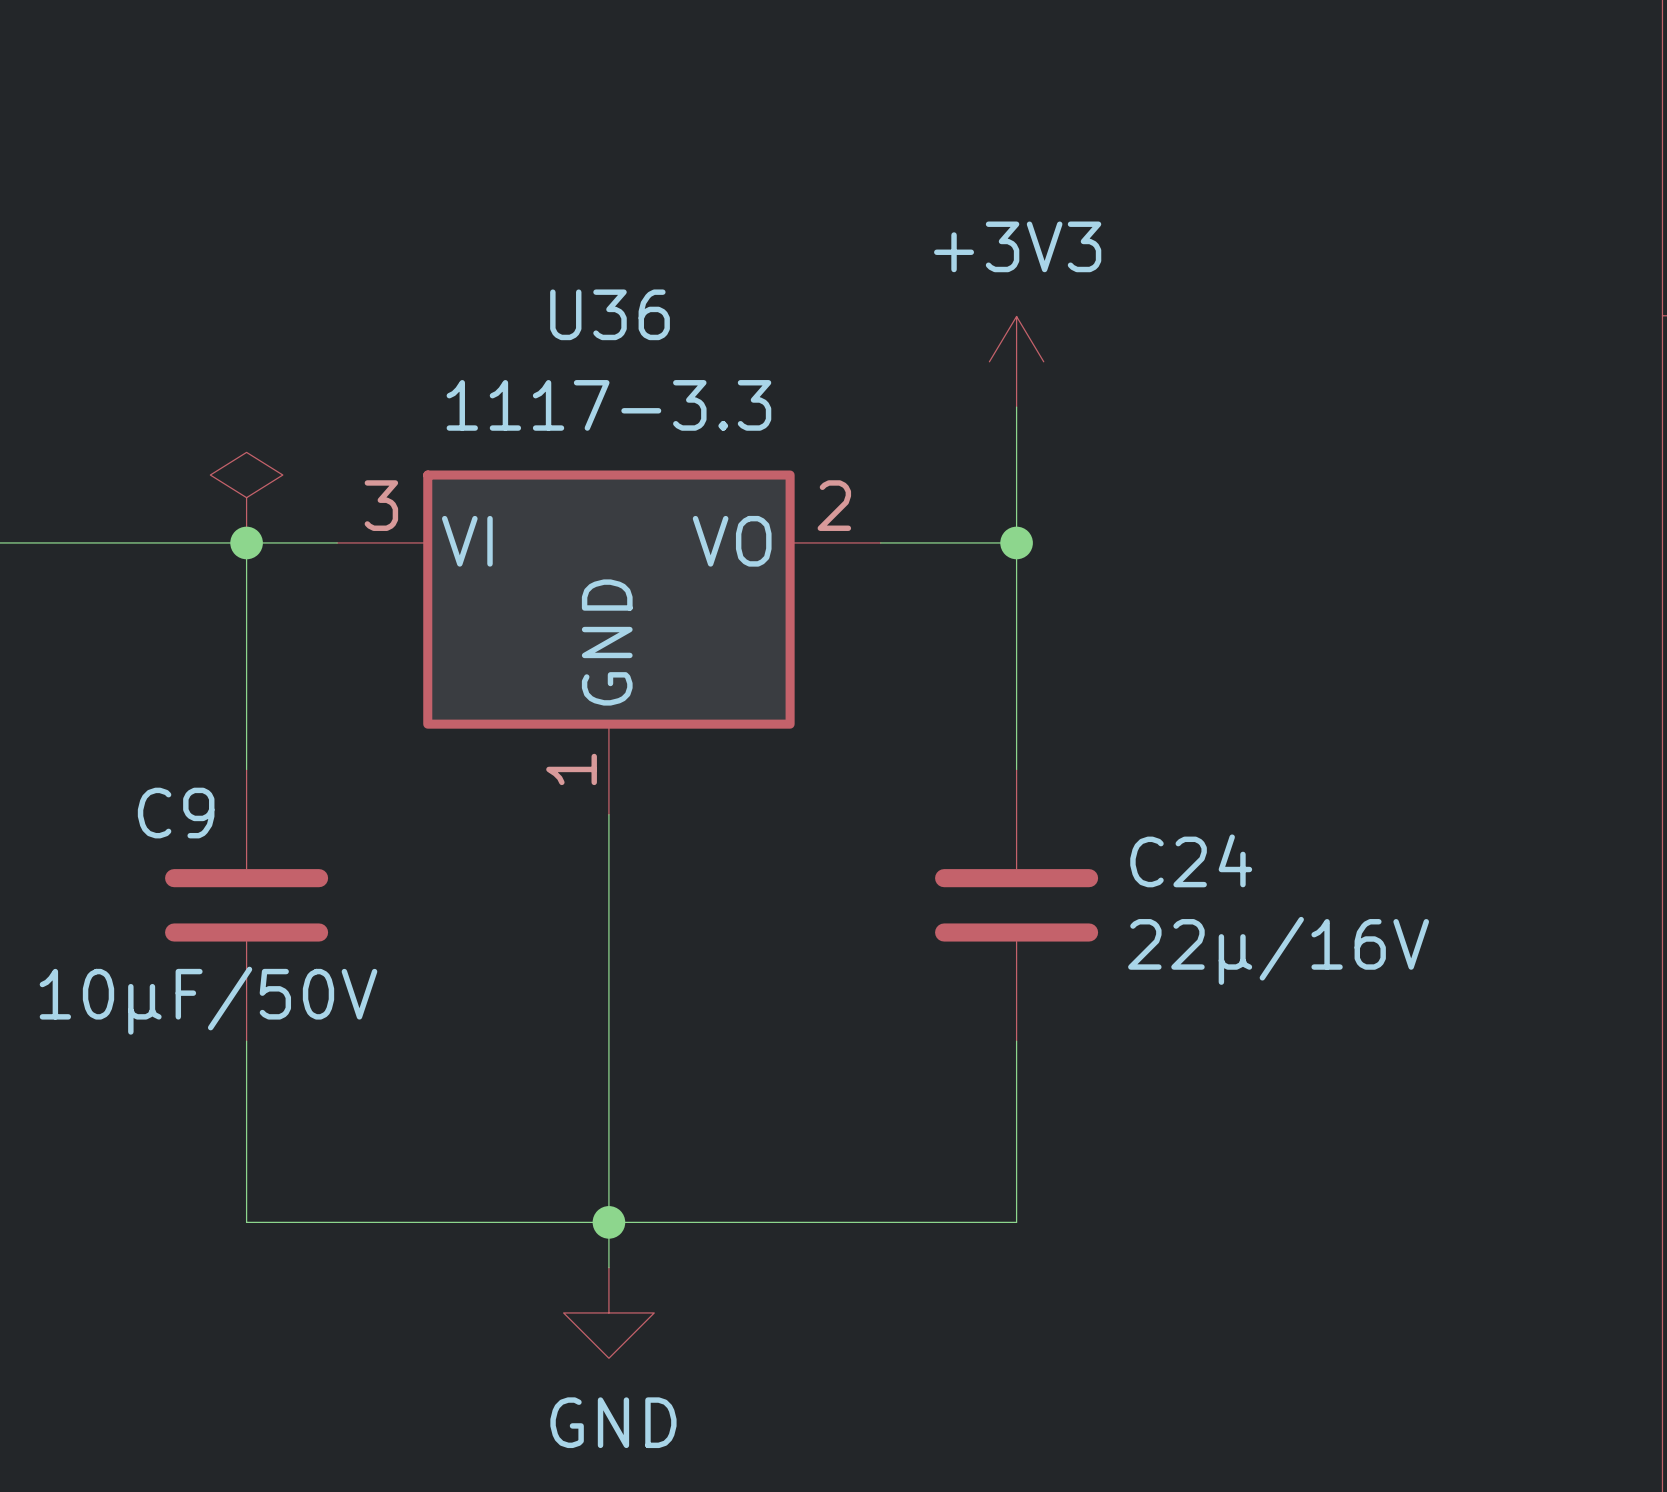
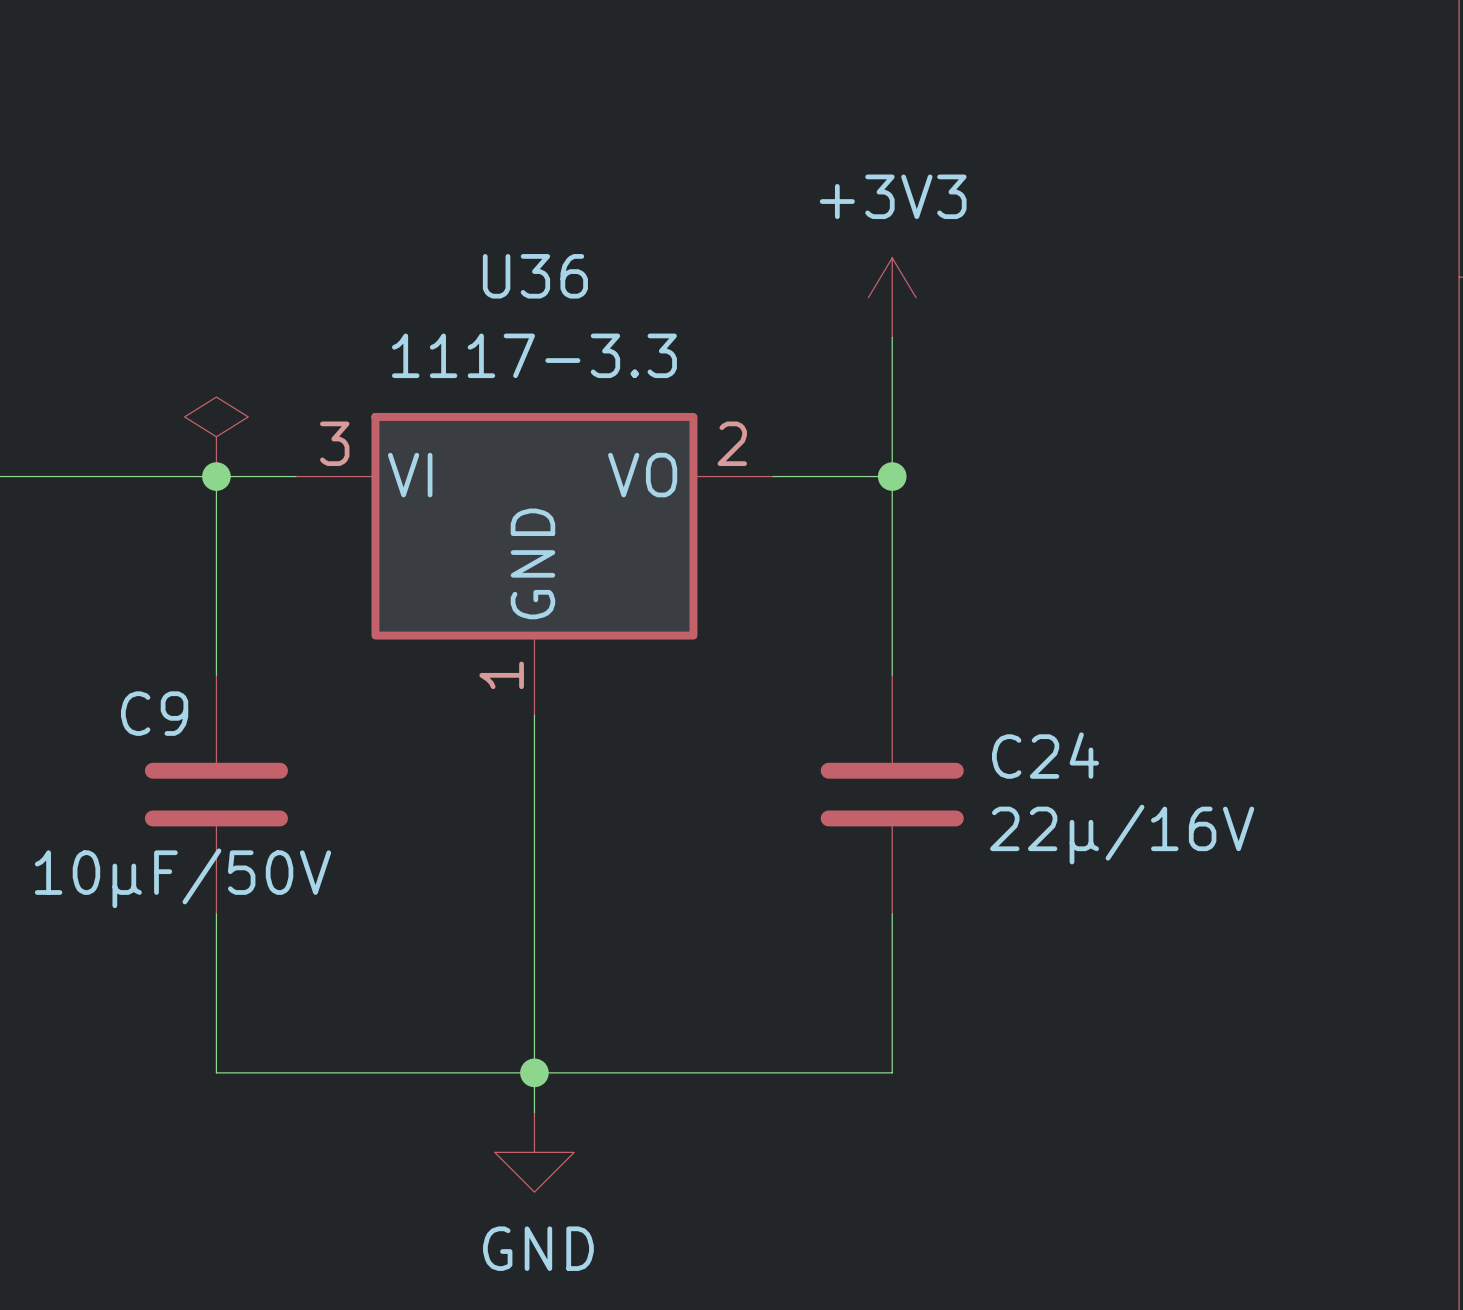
power symbol position: +3V3 (1016, 361) -> +3V3 (892, 297)

